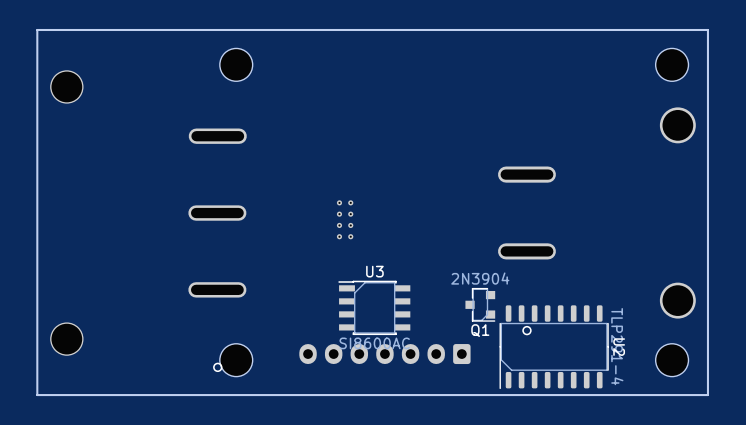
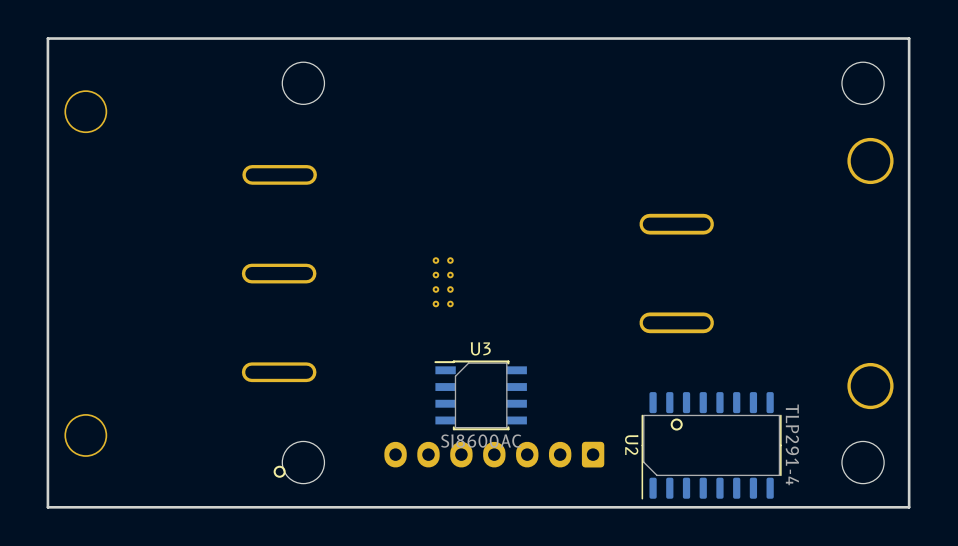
Q1: 2N3904 (480, 304) -> none
U2 name position: U2 (619, 347) -> U2 (631, 445)

